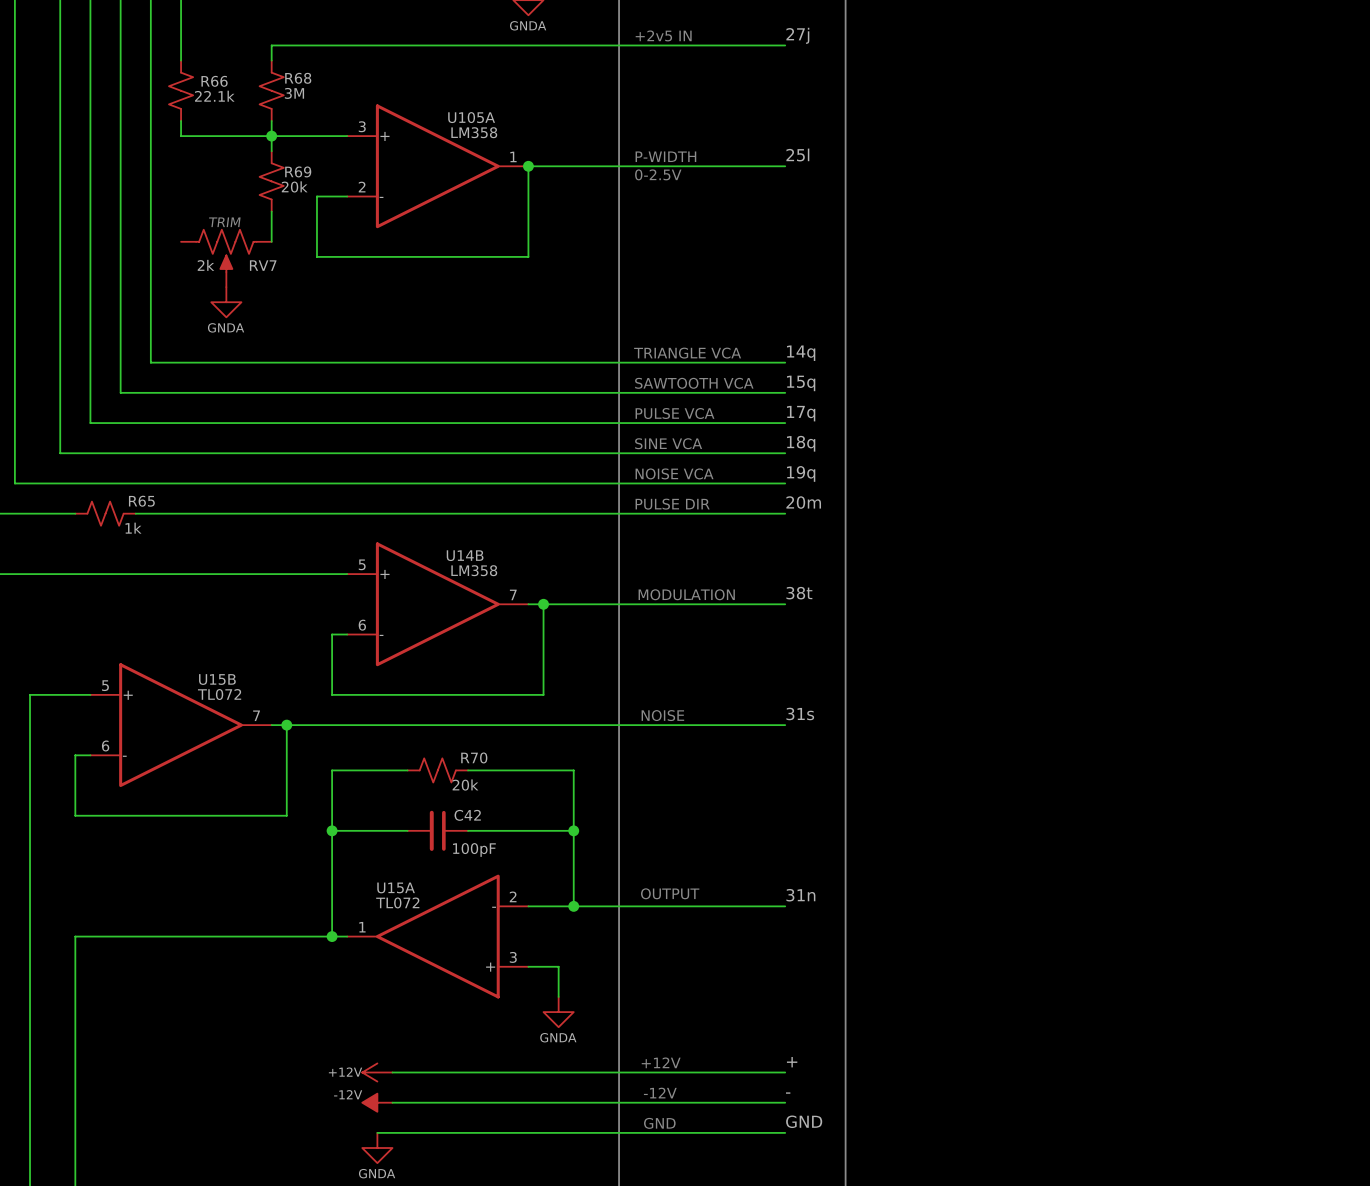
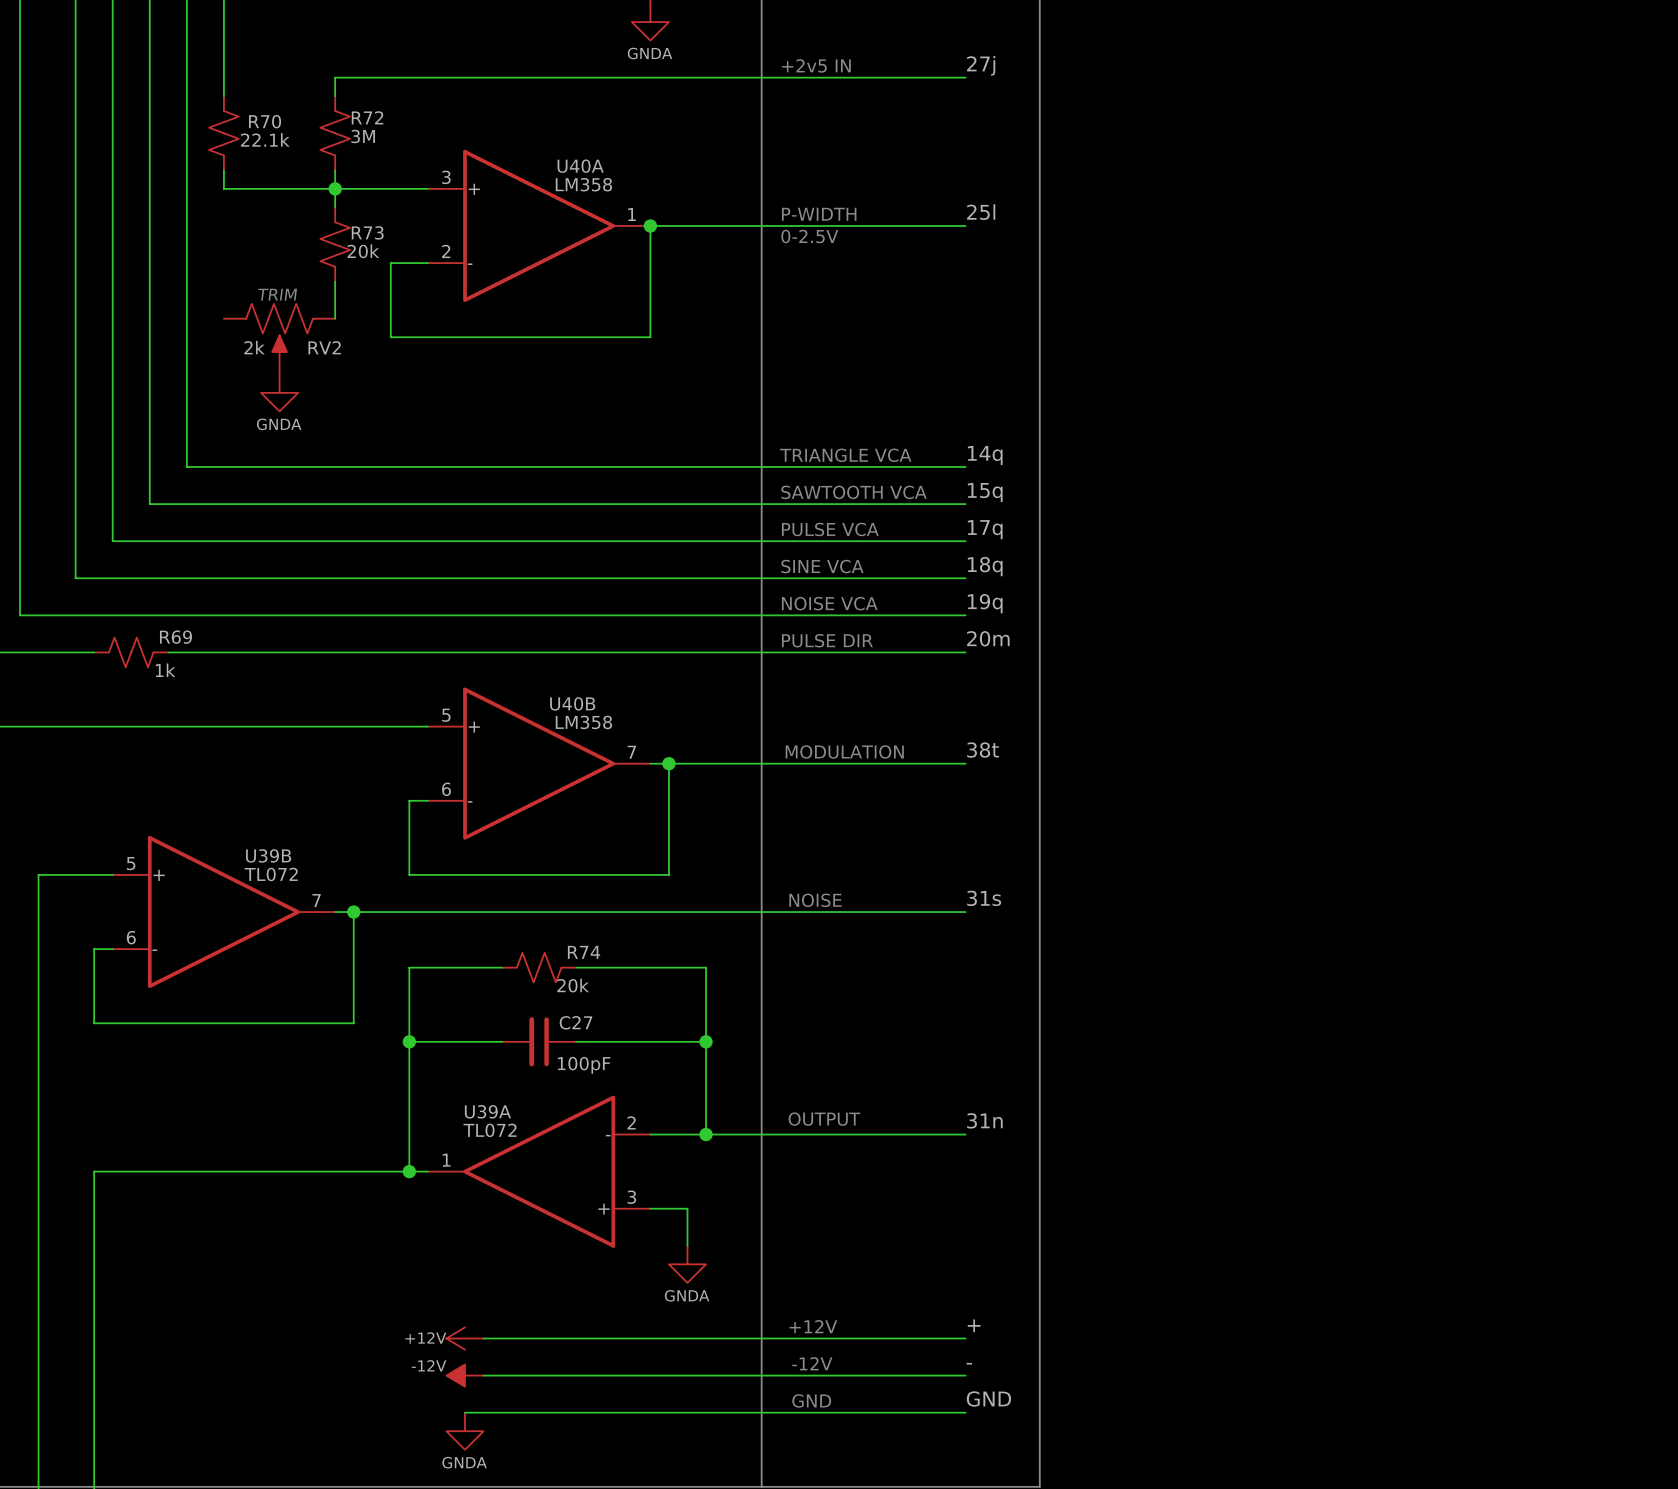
R68 name: R68 (298, 78) -> R72 (367, 117)
R66 name: R66 (214, 81) -> R70 (265, 121)
U105A name: U105A (471, 117) -> U40A (580, 166)
R69 name: R69 (298, 171) -> R73 (367, 232)
RV7 name: RV7 (263, 265) -> RV2 (324, 347)
R65 name: R65 (141, 501) -> R69 (175, 637)
U14B name: U14B (465, 555) -> U40B (572, 703)
U15B name: U15B (217, 679) -> U39B (268, 855)
R70 name: R70 (474, 757) -> R74 (584, 952)
C42 name: C42 (467, 815) -> C27 (575, 1022)
U15A name: U15A (396, 887) -> U39A (487, 1111)

